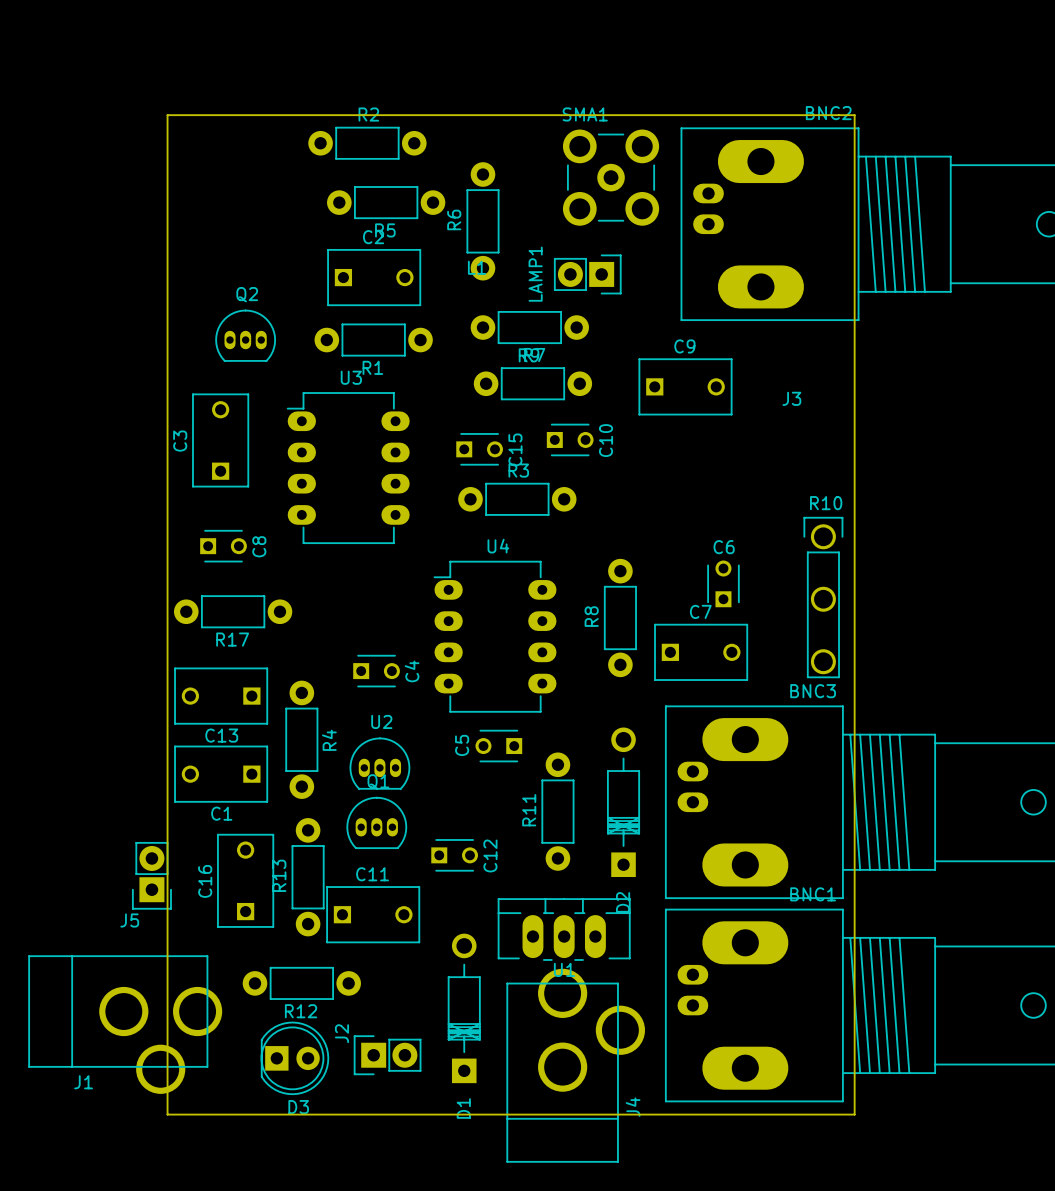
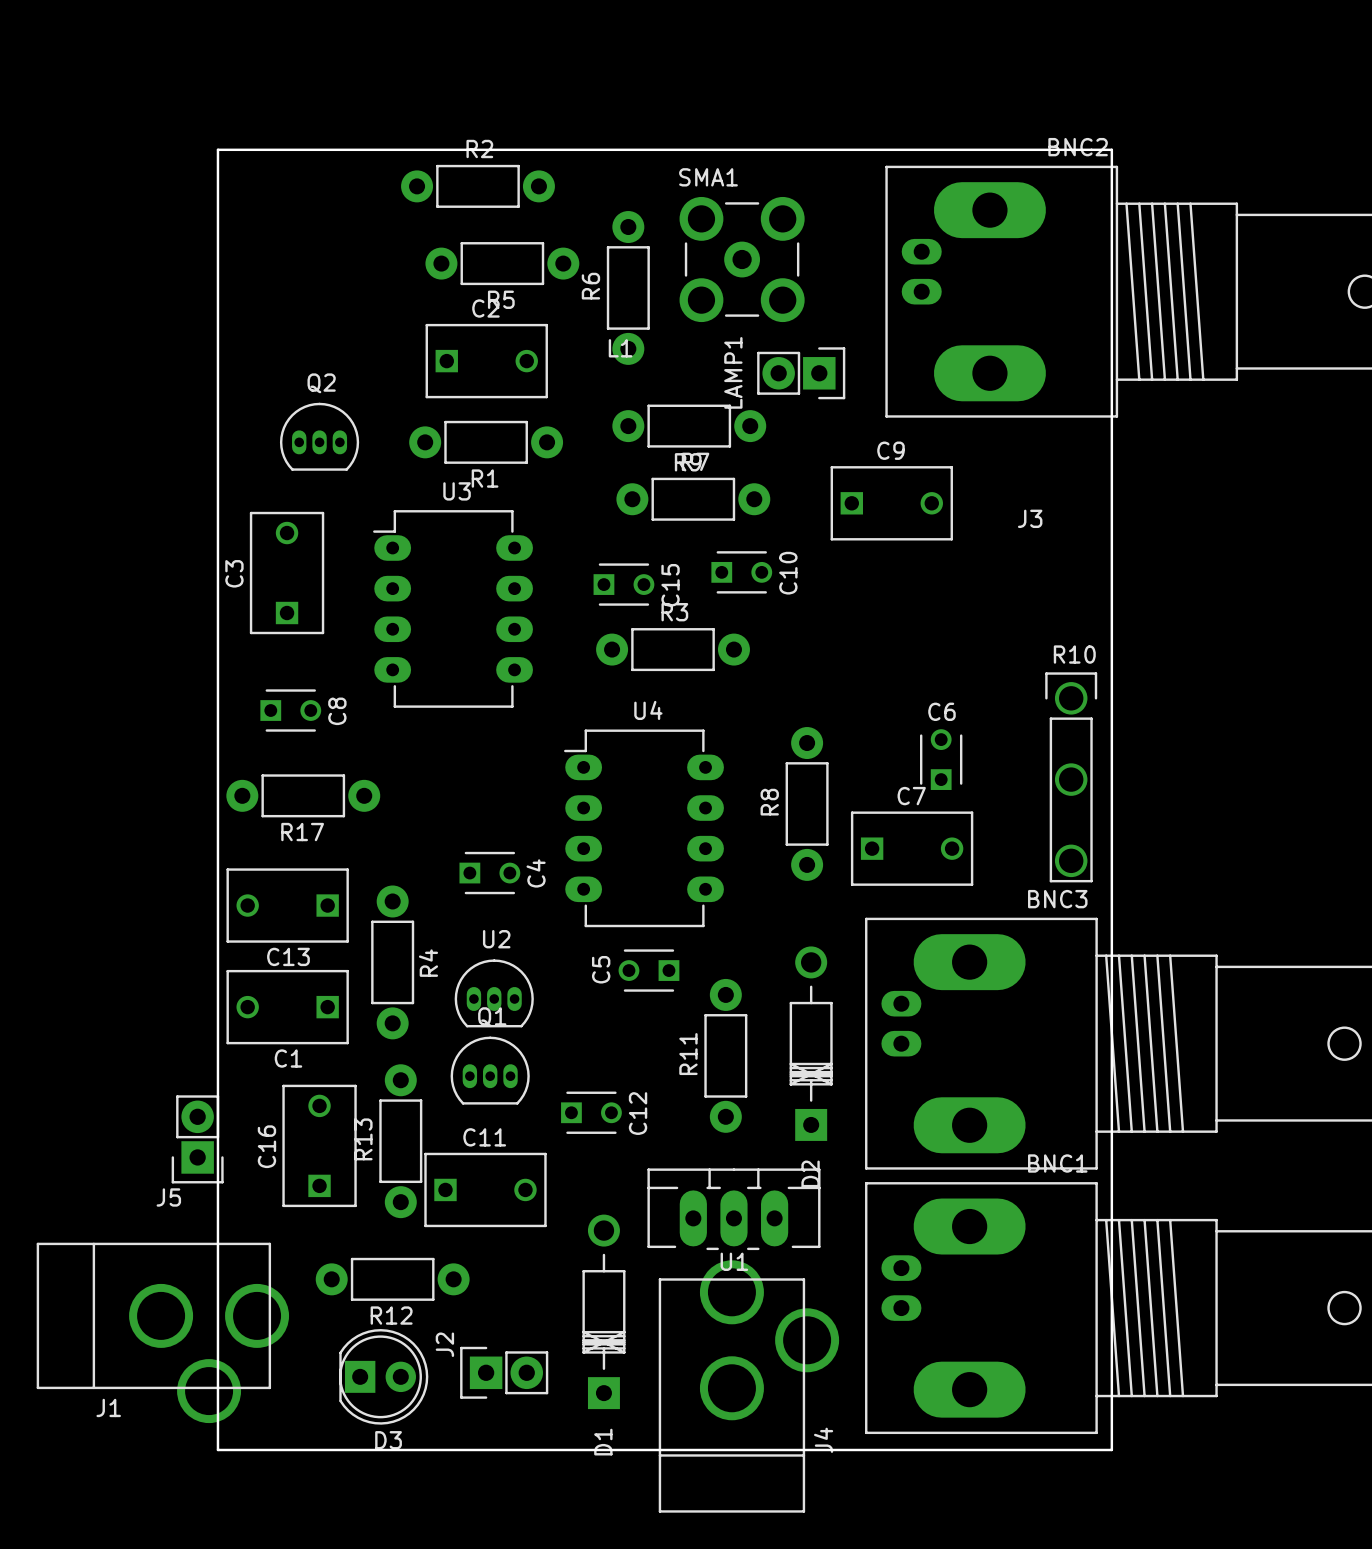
SMA1 position: (611, 177) -> (742, 259)
LAMP1 position: (587, 274) -> (801, 373)

